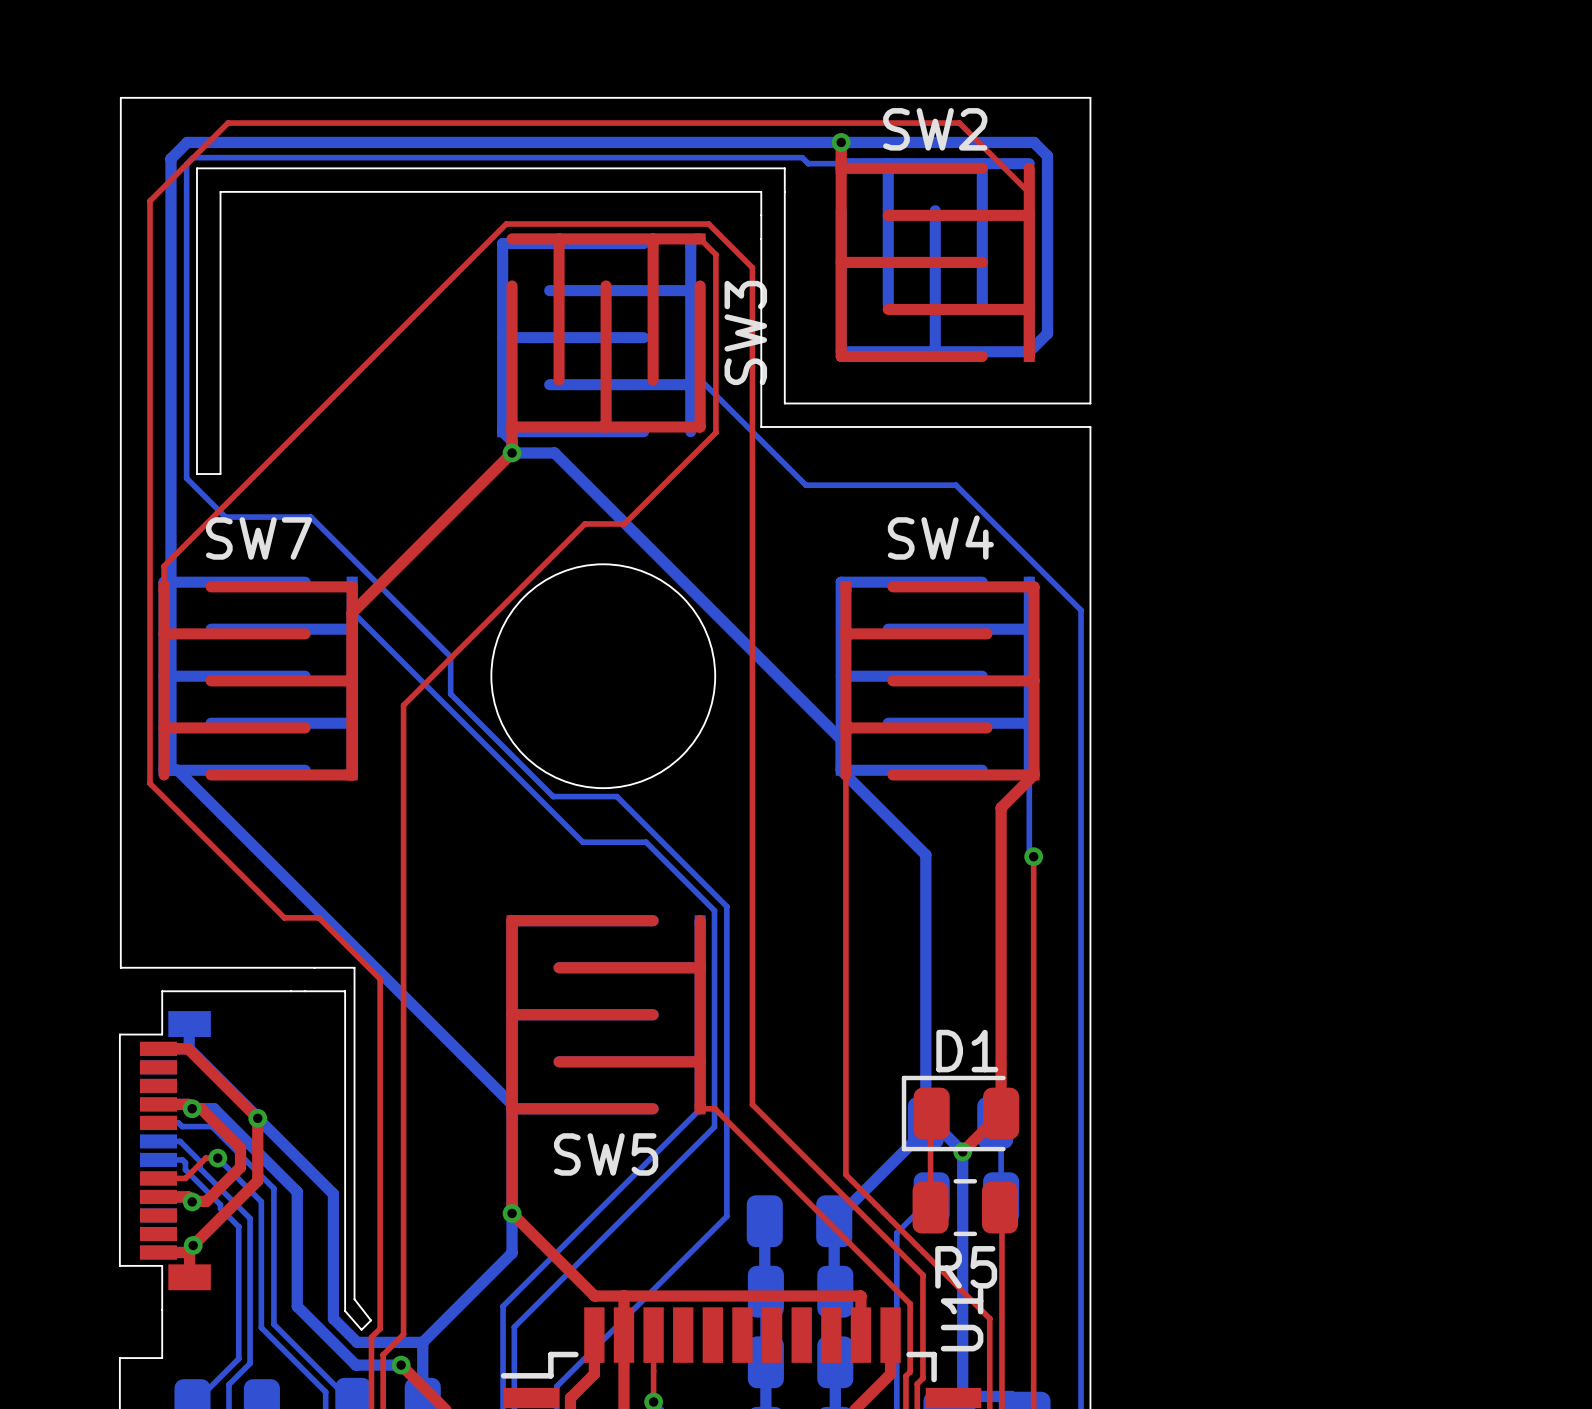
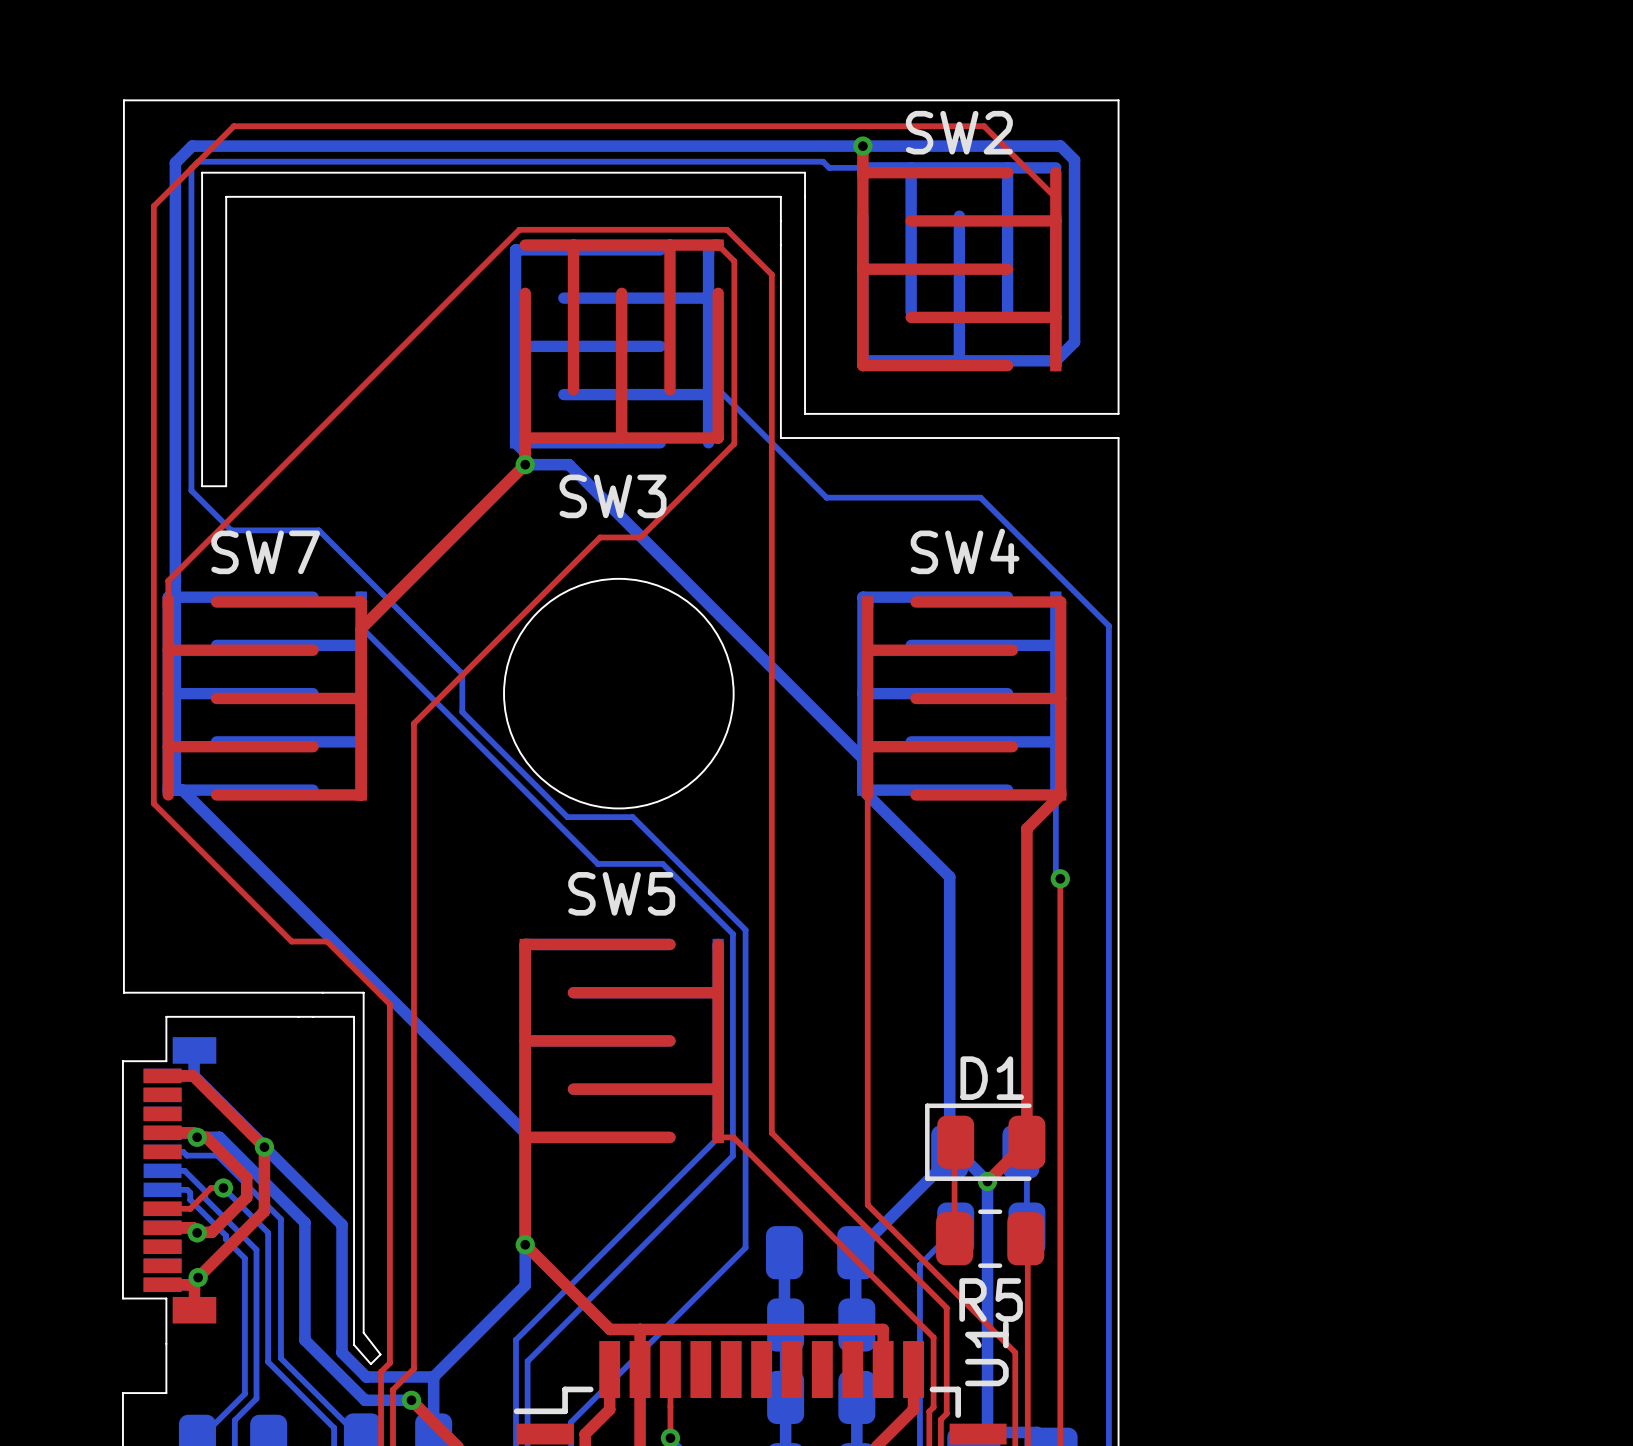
SW3 name rotation: 0° (745, 332) -> 90° clockwise (613, 496)
SW3 name position: SW3 (745, 332) -> SW3 (613, 496)
SW5 name position: SW5 (606, 1154) -> SW5 (621, 893)

